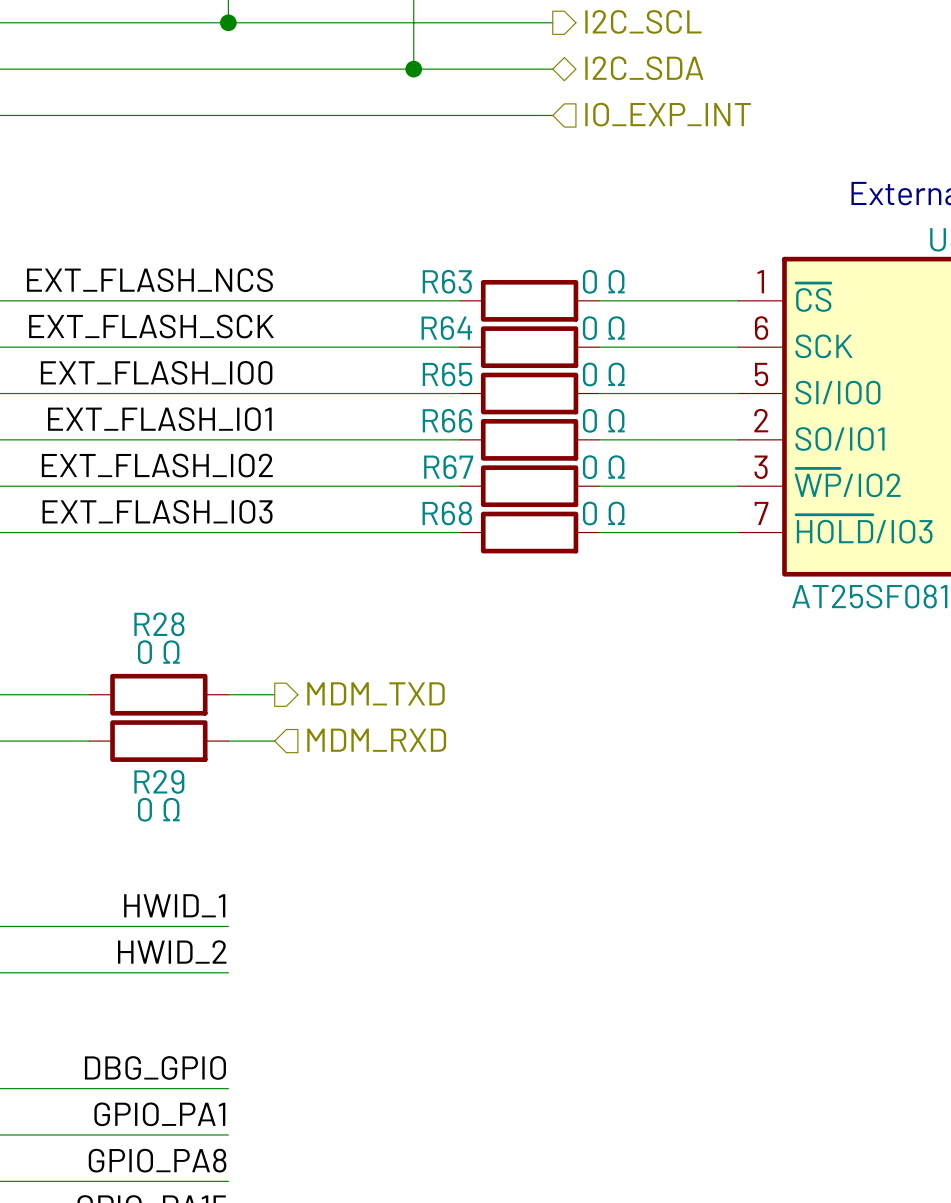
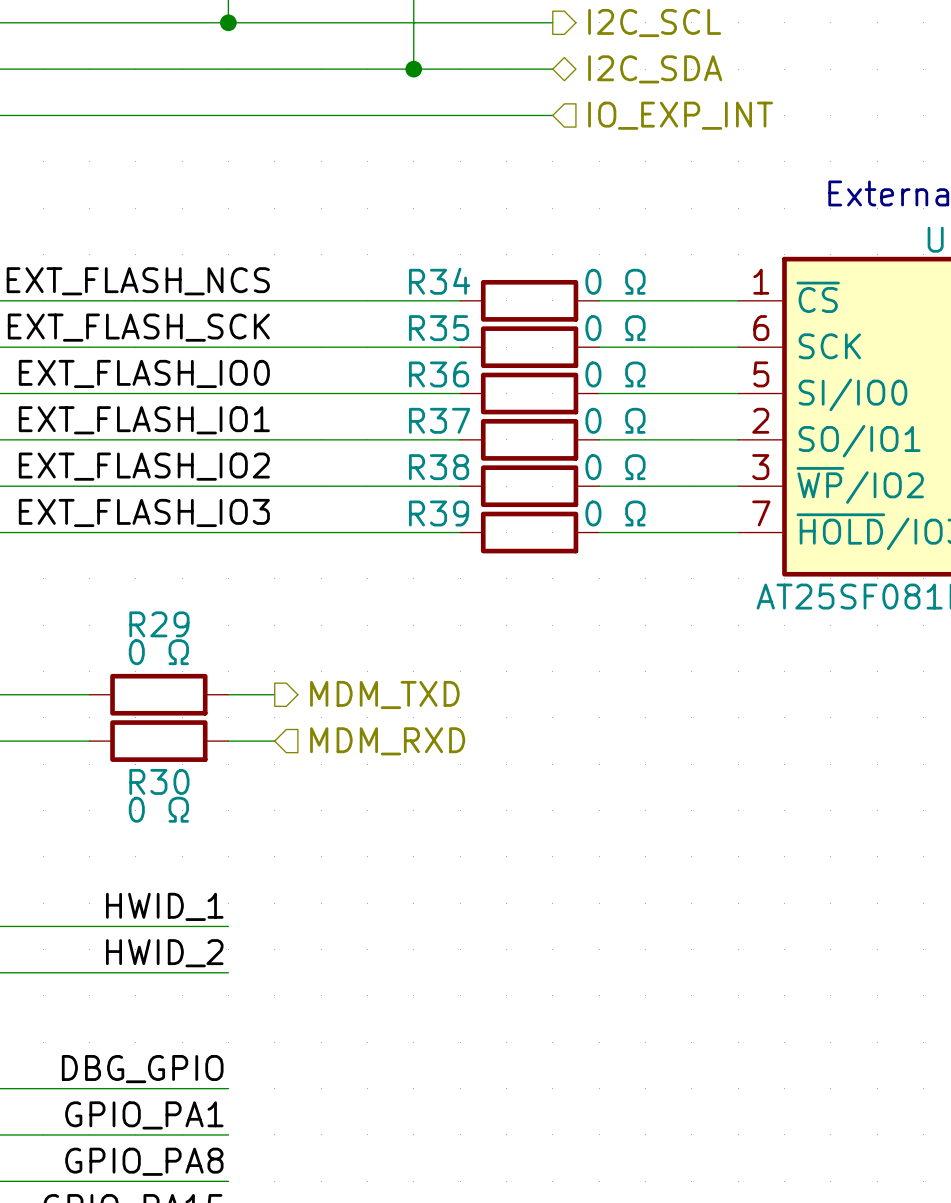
R63 name: R63 (447, 281) -> R34 (439, 281)
R64 name: R64 (446, 328) -> R35 (439, 328)
R65 name: R65 (447, 374) -> R36 (439, 374)
R66 name: R66 (447, 420) -> R37 (439, 420)
R67 name: R67 (448, 467) -> R38 (439, 467)
R68 name: R68 (447, 513) -> R39 (439, 513)
R28 name: R28 (159, 624) -> R29 (159, 624)
R29 name: R29 (159, 781) -> R30 (159, 781)

